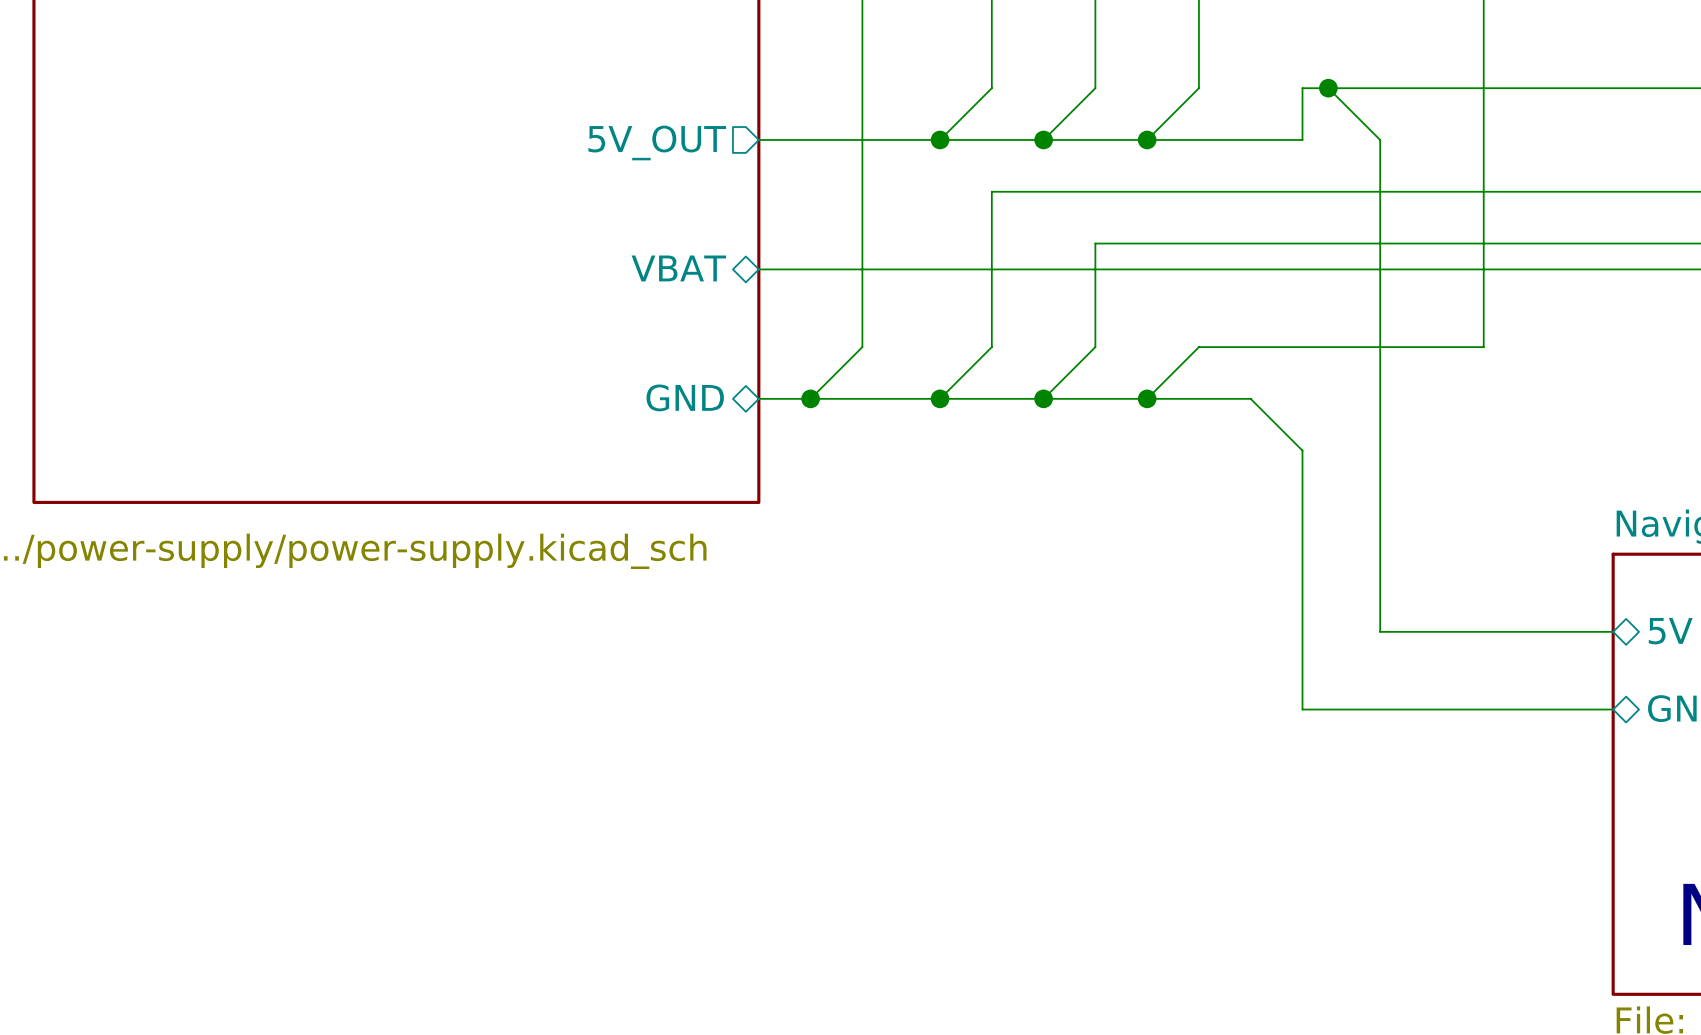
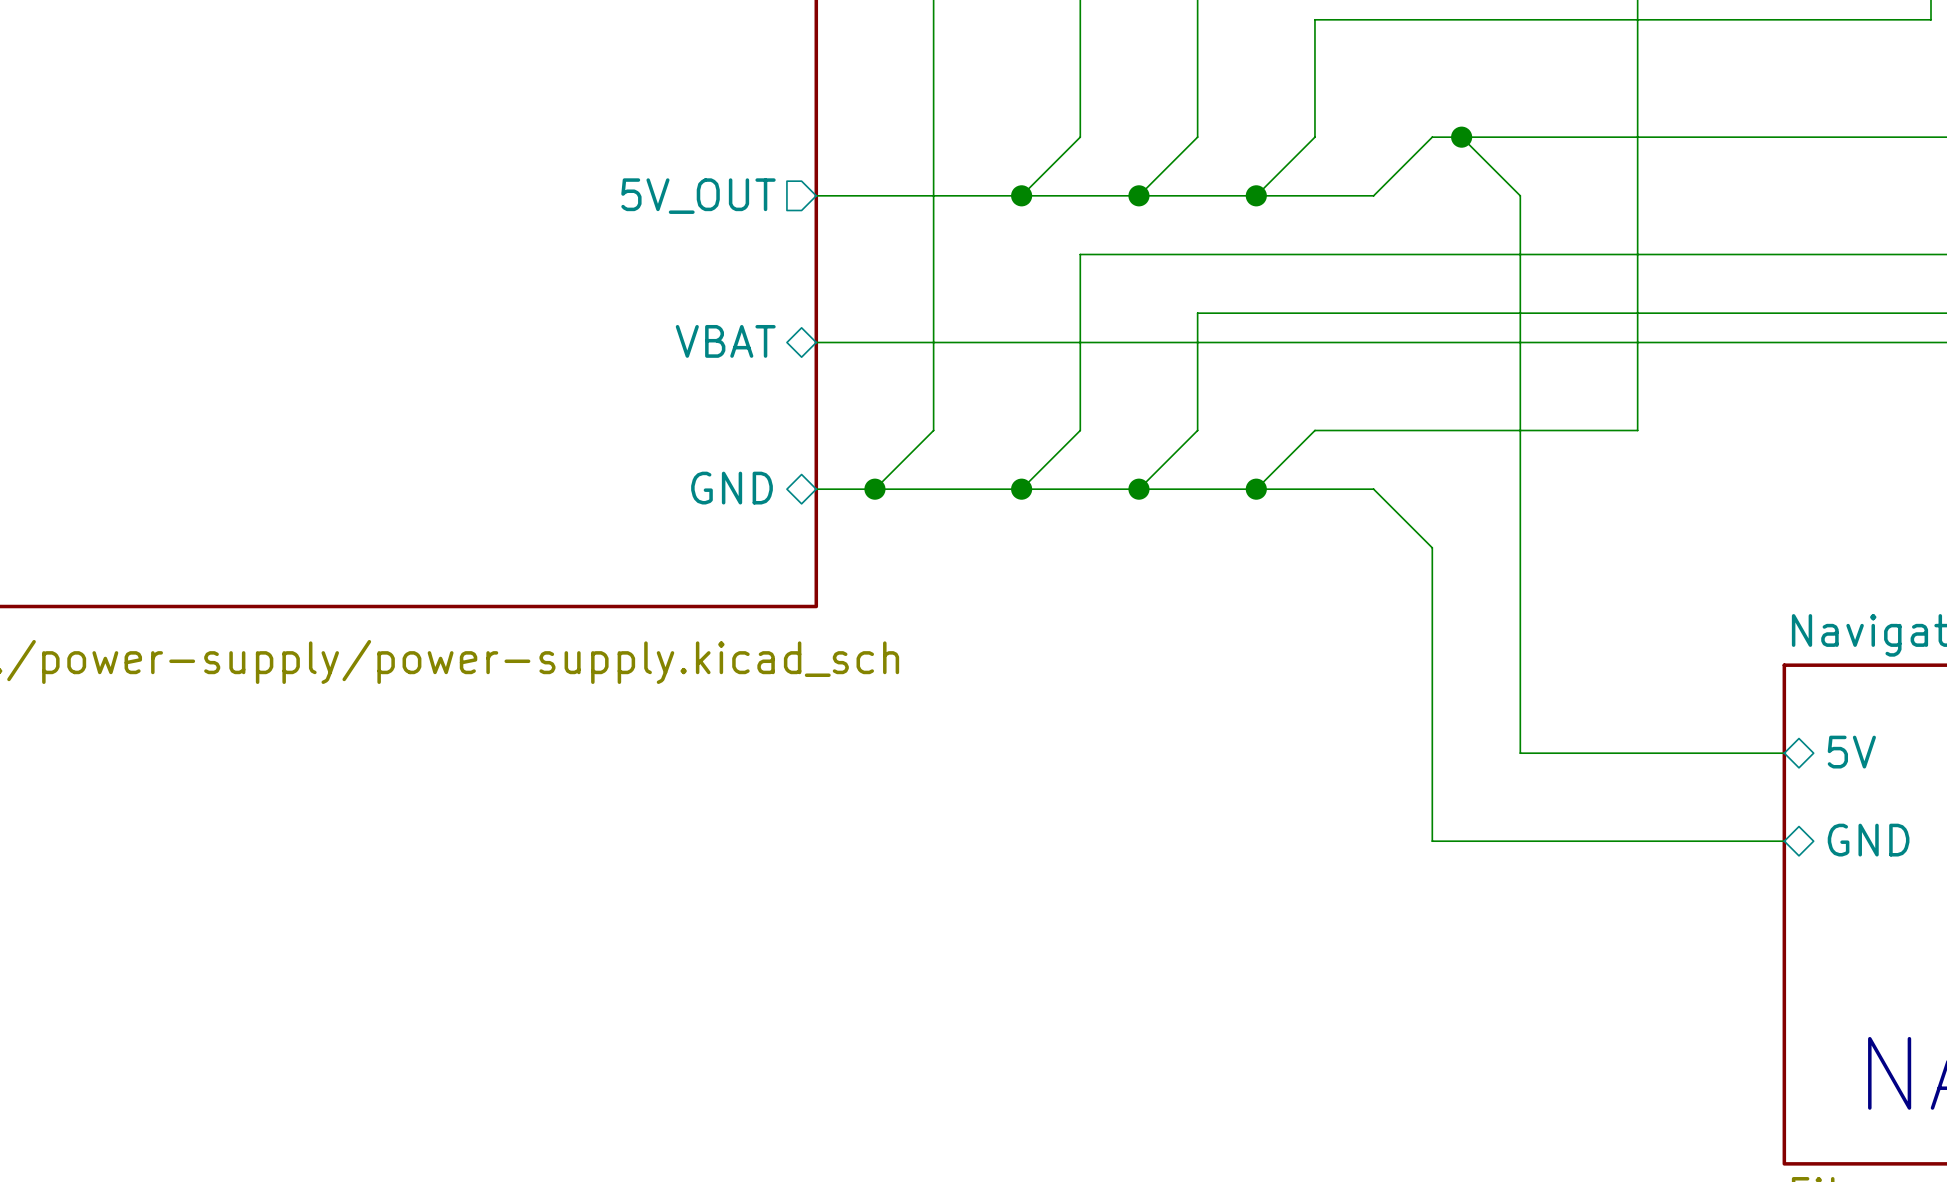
wire: (1302, 88) (1302, 139) (1250, 139) -> (1432, 137) (1373, 195)

